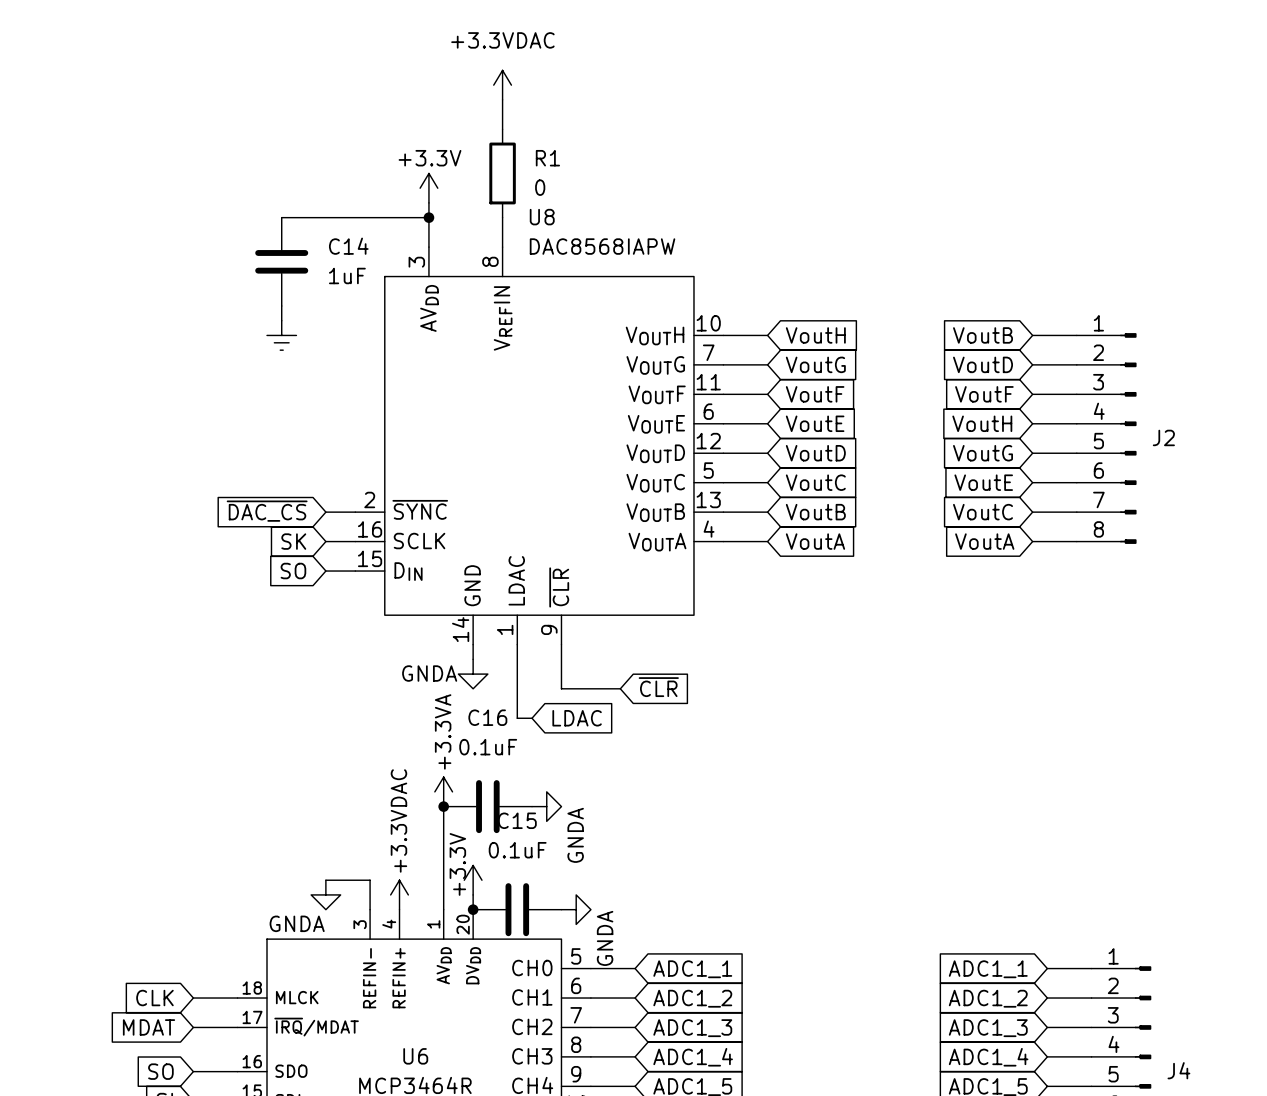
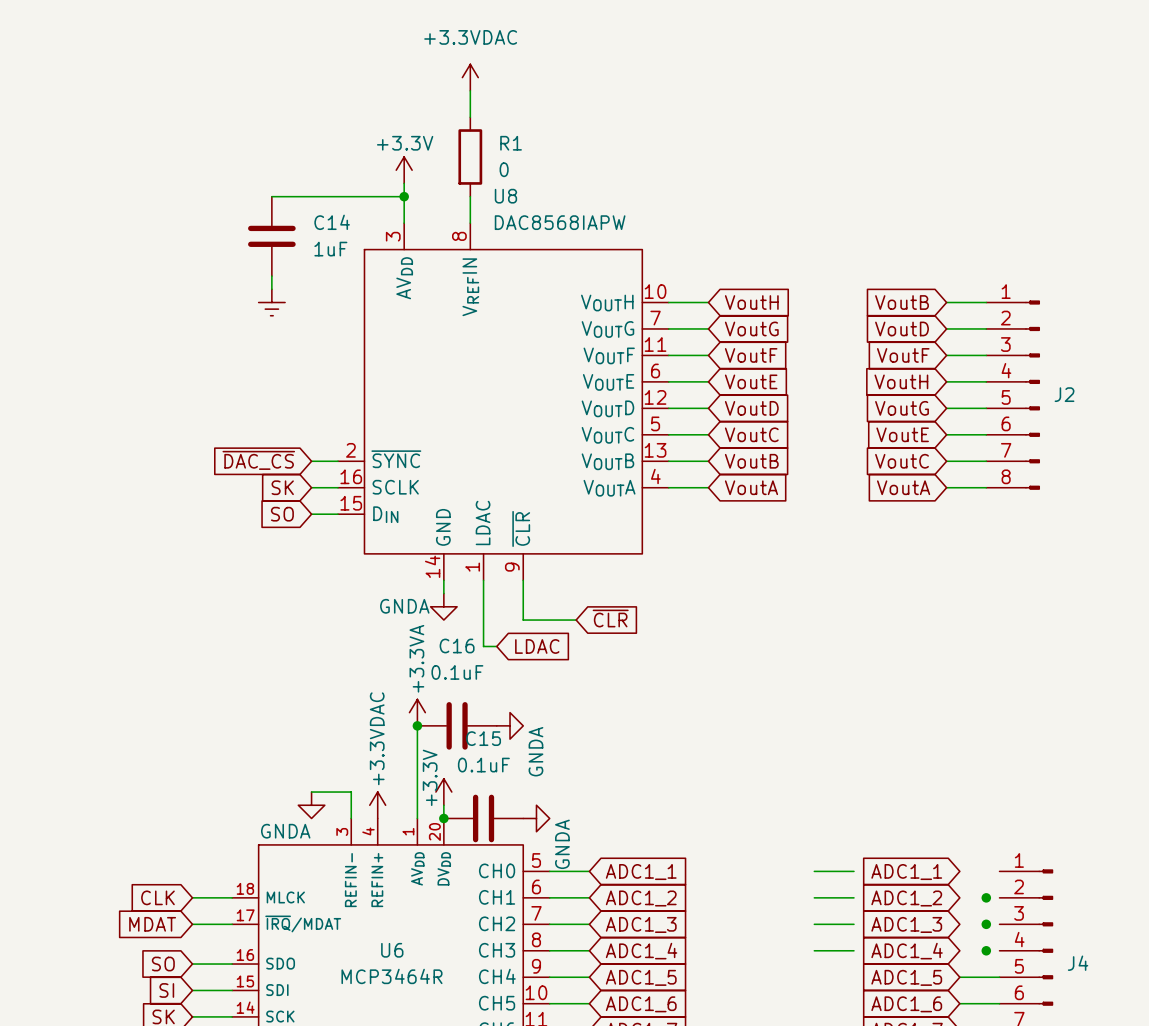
wire: (1047, 968) (1091, 968) -> (814, 871) (853, 871)
wire: (1047, 998) (1091, 998) -> (814, 897) (853, 897)
junction: none -> (986, 897)
wire: (1047, 1027) (1091, 1027) -> (814, 924) (853, 924)
junction: none -> (986, 924)
wire: (1047, 1056) (1091, 1056) -> (814, 950) (853, 950)
junction: none -> (986, 950)

